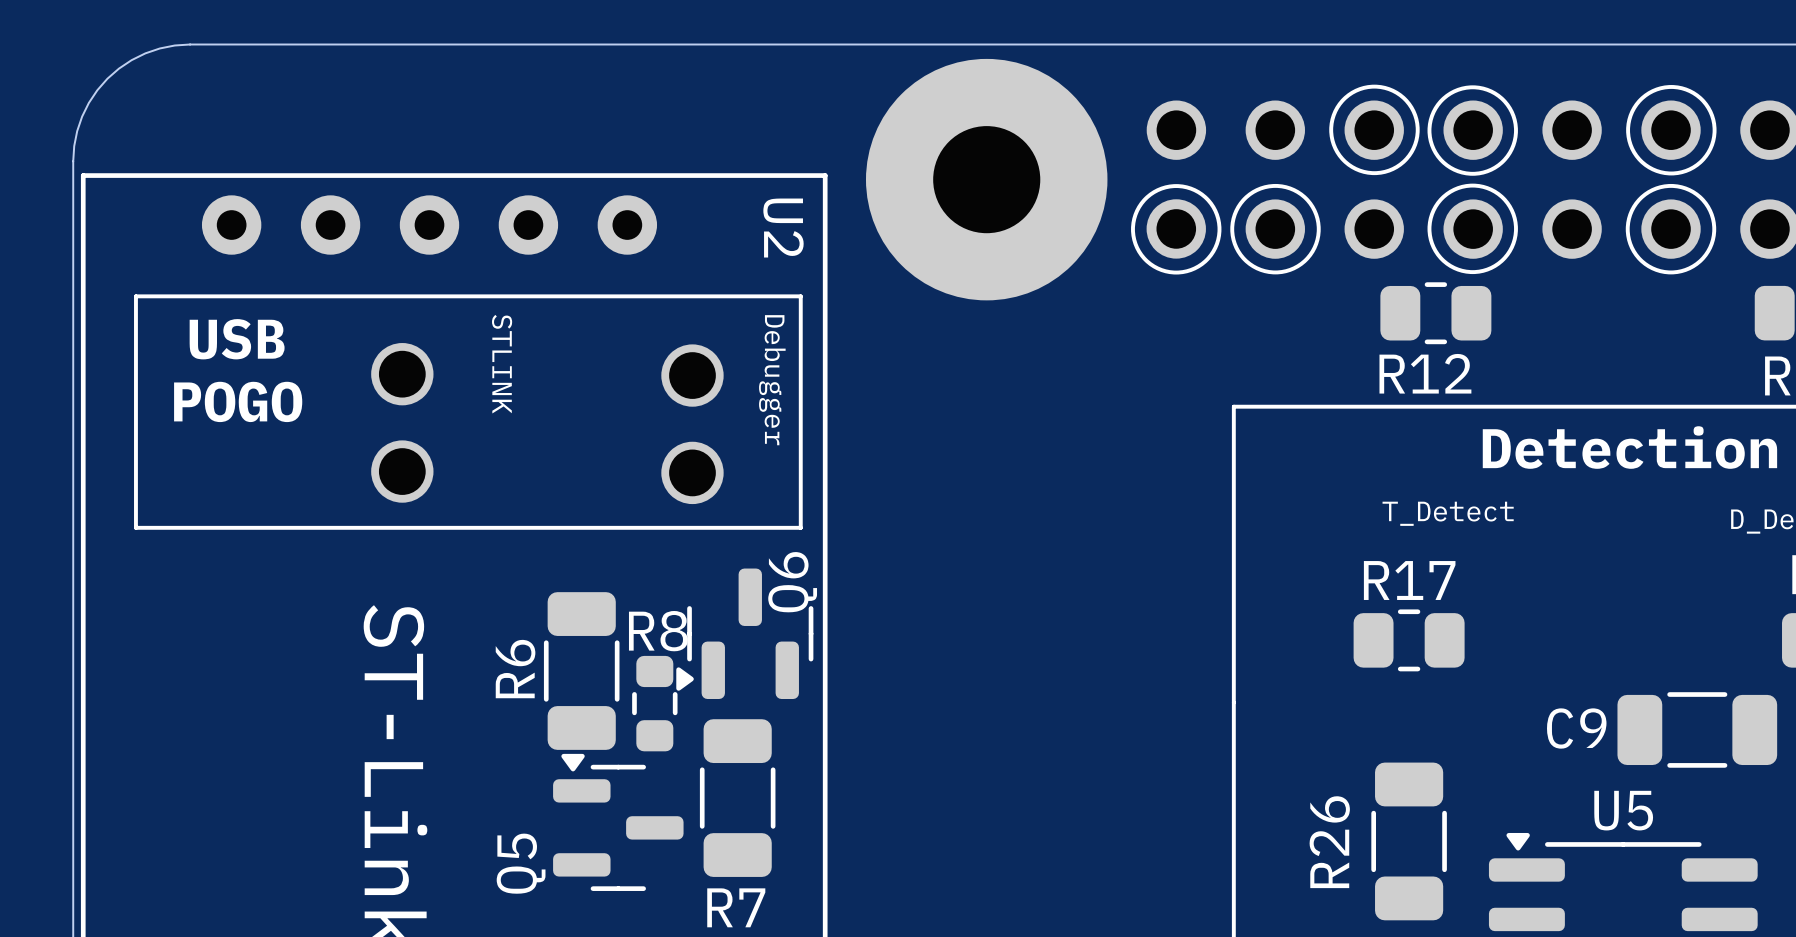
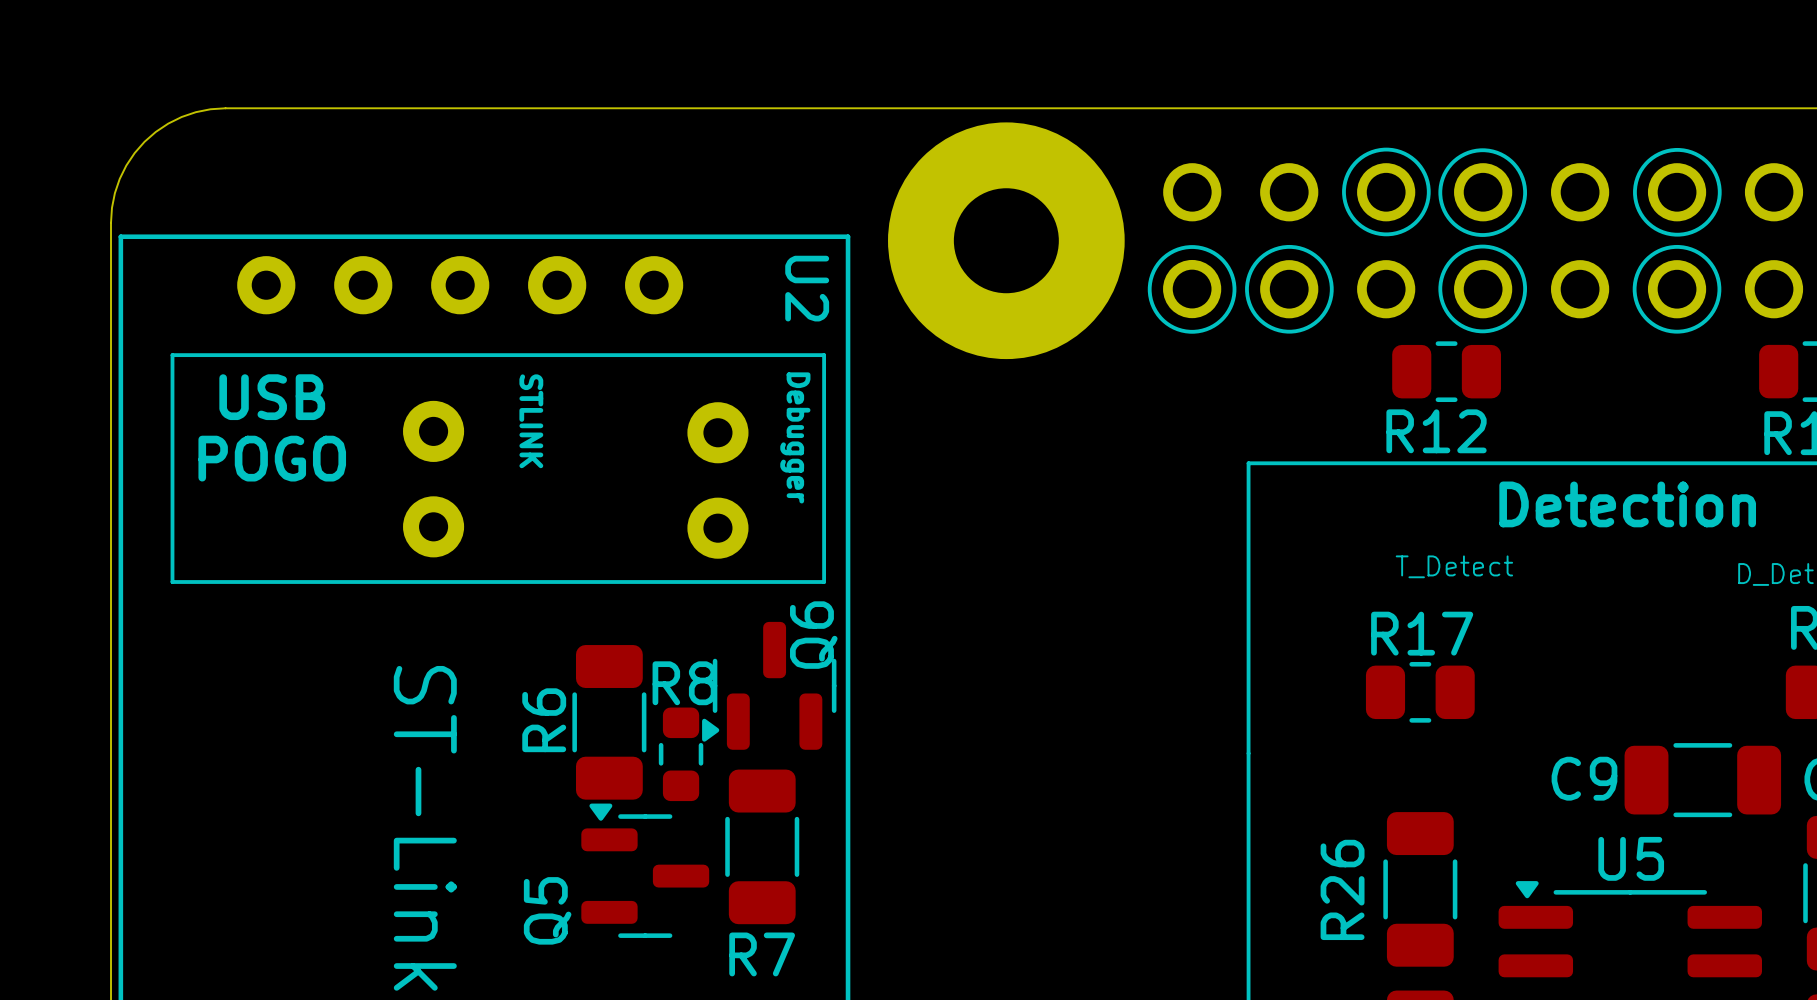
part footprint: [371, 343, 434, 406] -> [403, 400, 465, 462]
part footprint: [661, 344, 724, 407] -> [687, 402, 749, 464]
part footprint: [371, 440, 434, 503] -> [403, 496, 465, 558]
part footprint: [661, 441, 724, 505] -> [687, 497, 749, 559]

